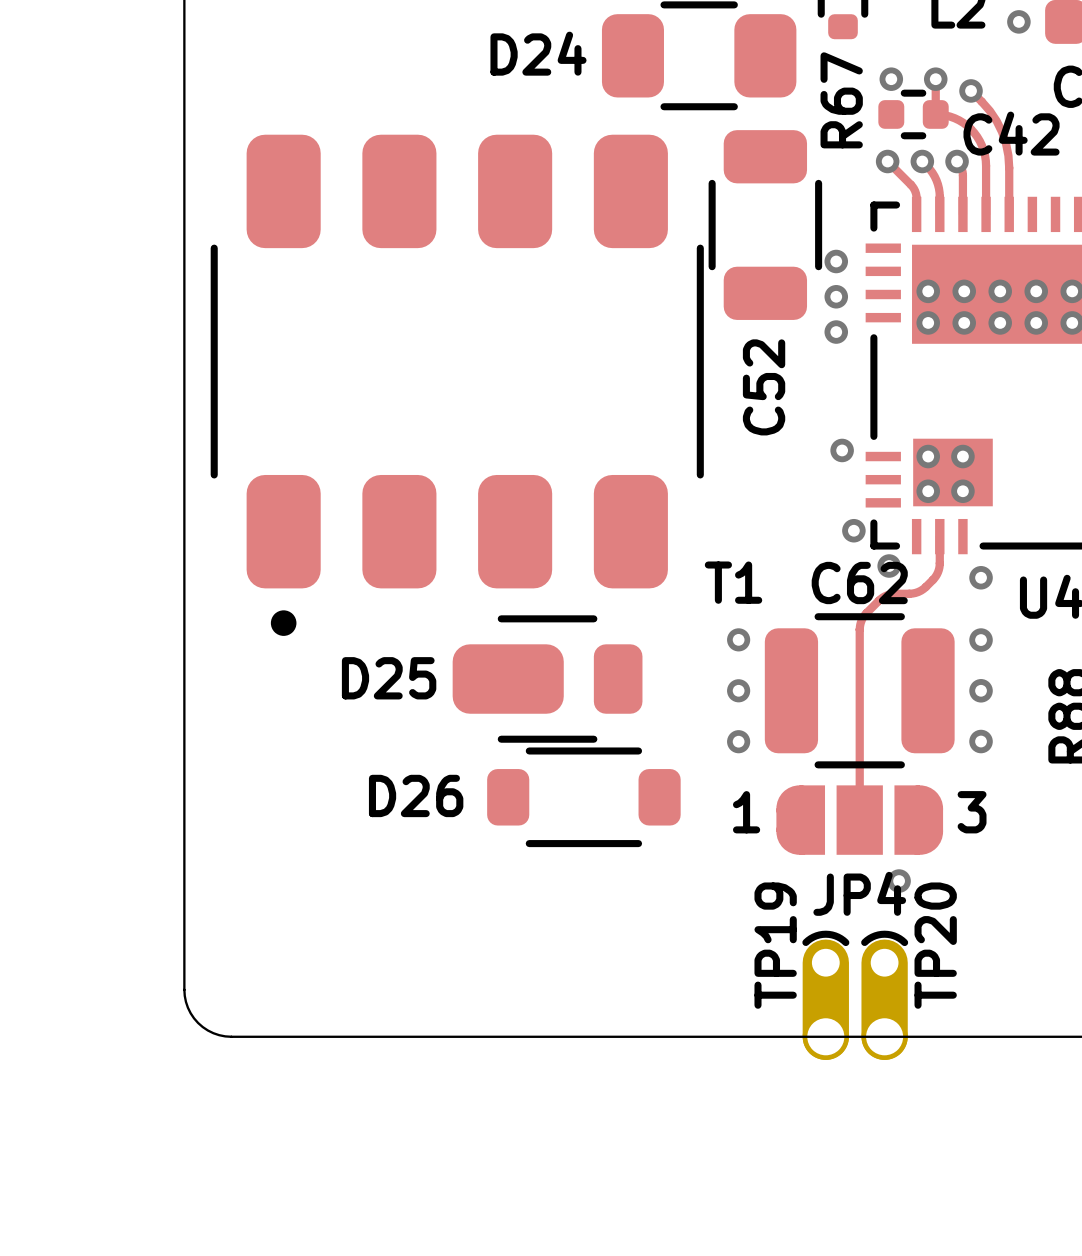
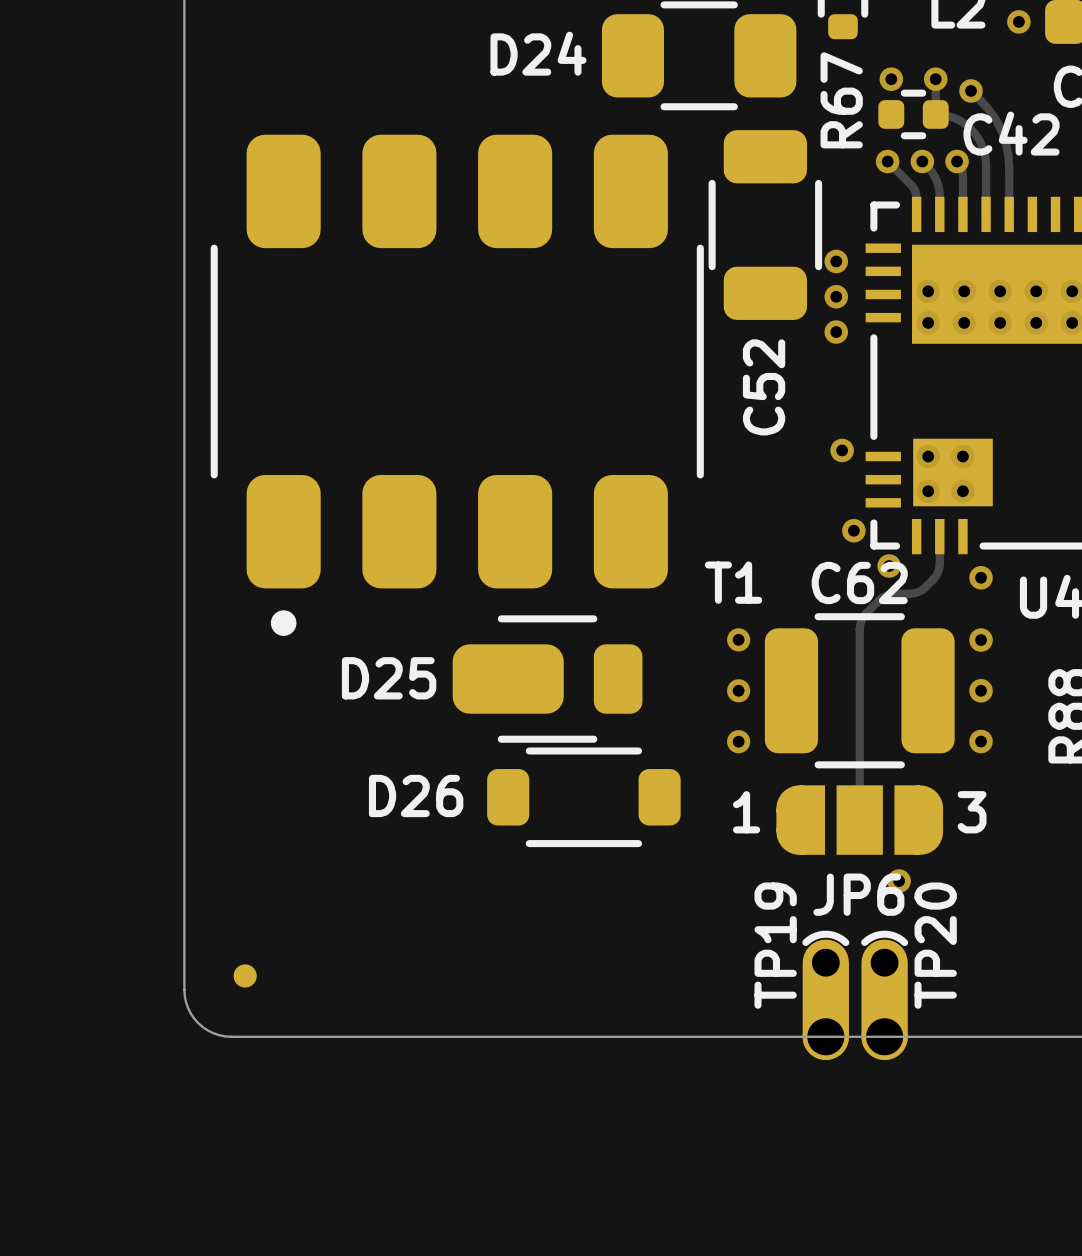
JP4 name: JP4 (859, 893) -> JP6 (858, 894)
part: none -> (245, 975)

